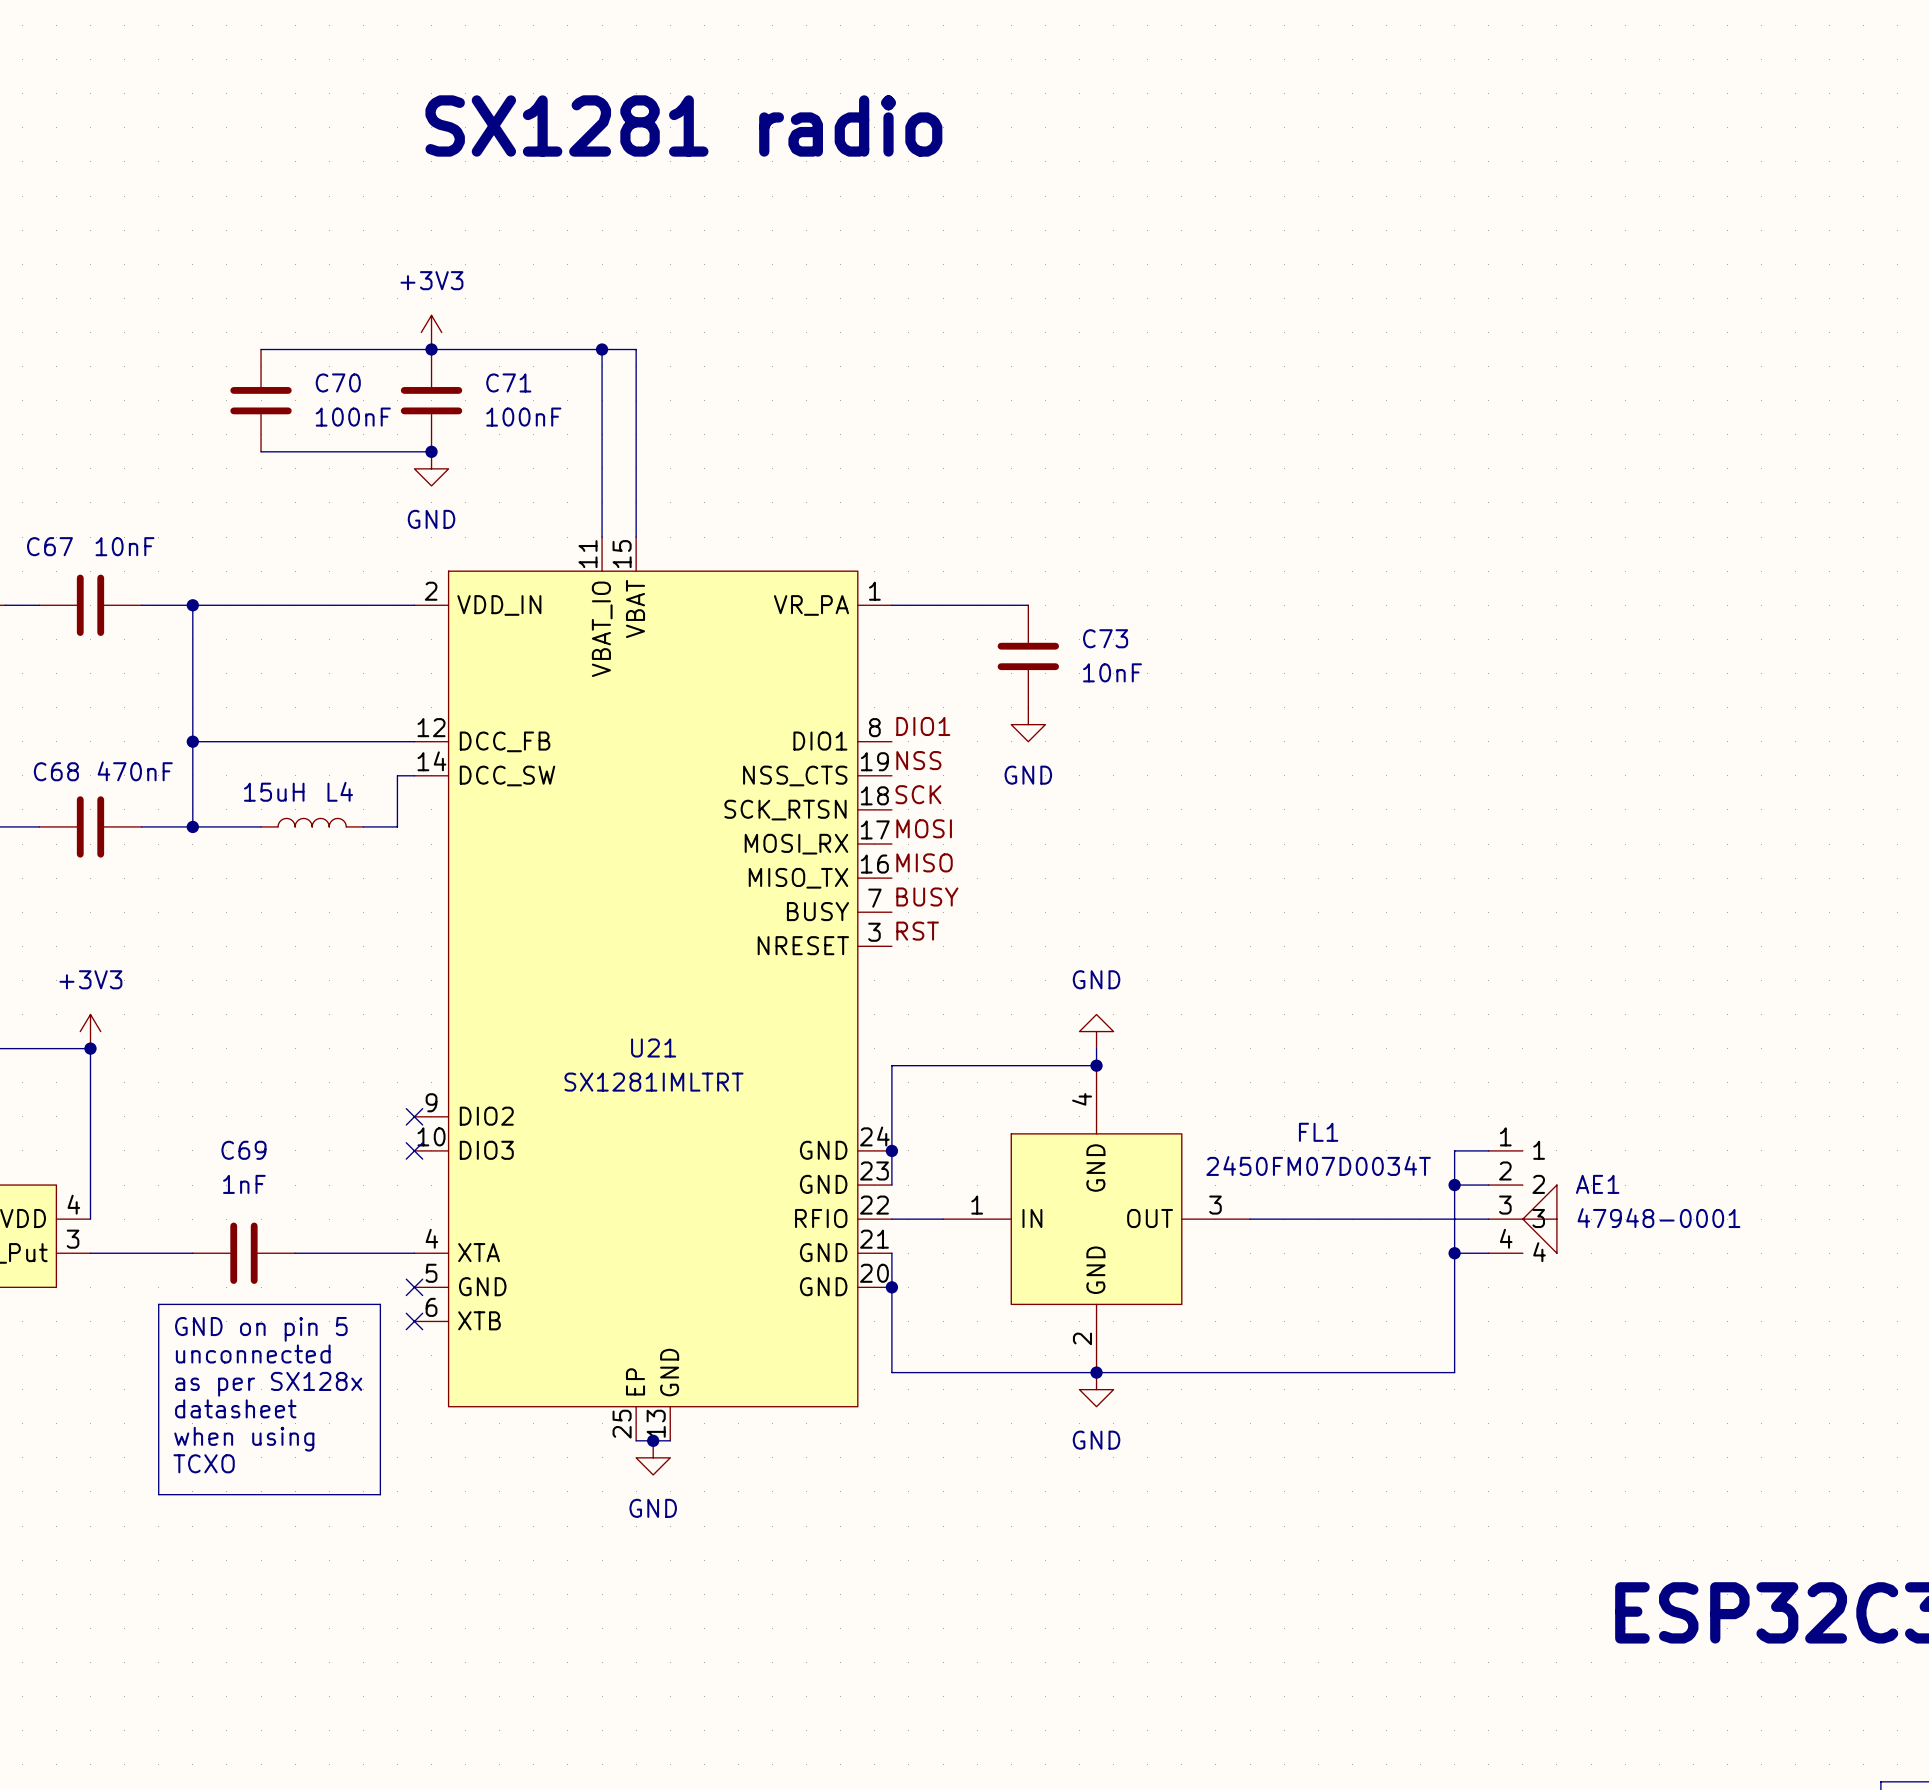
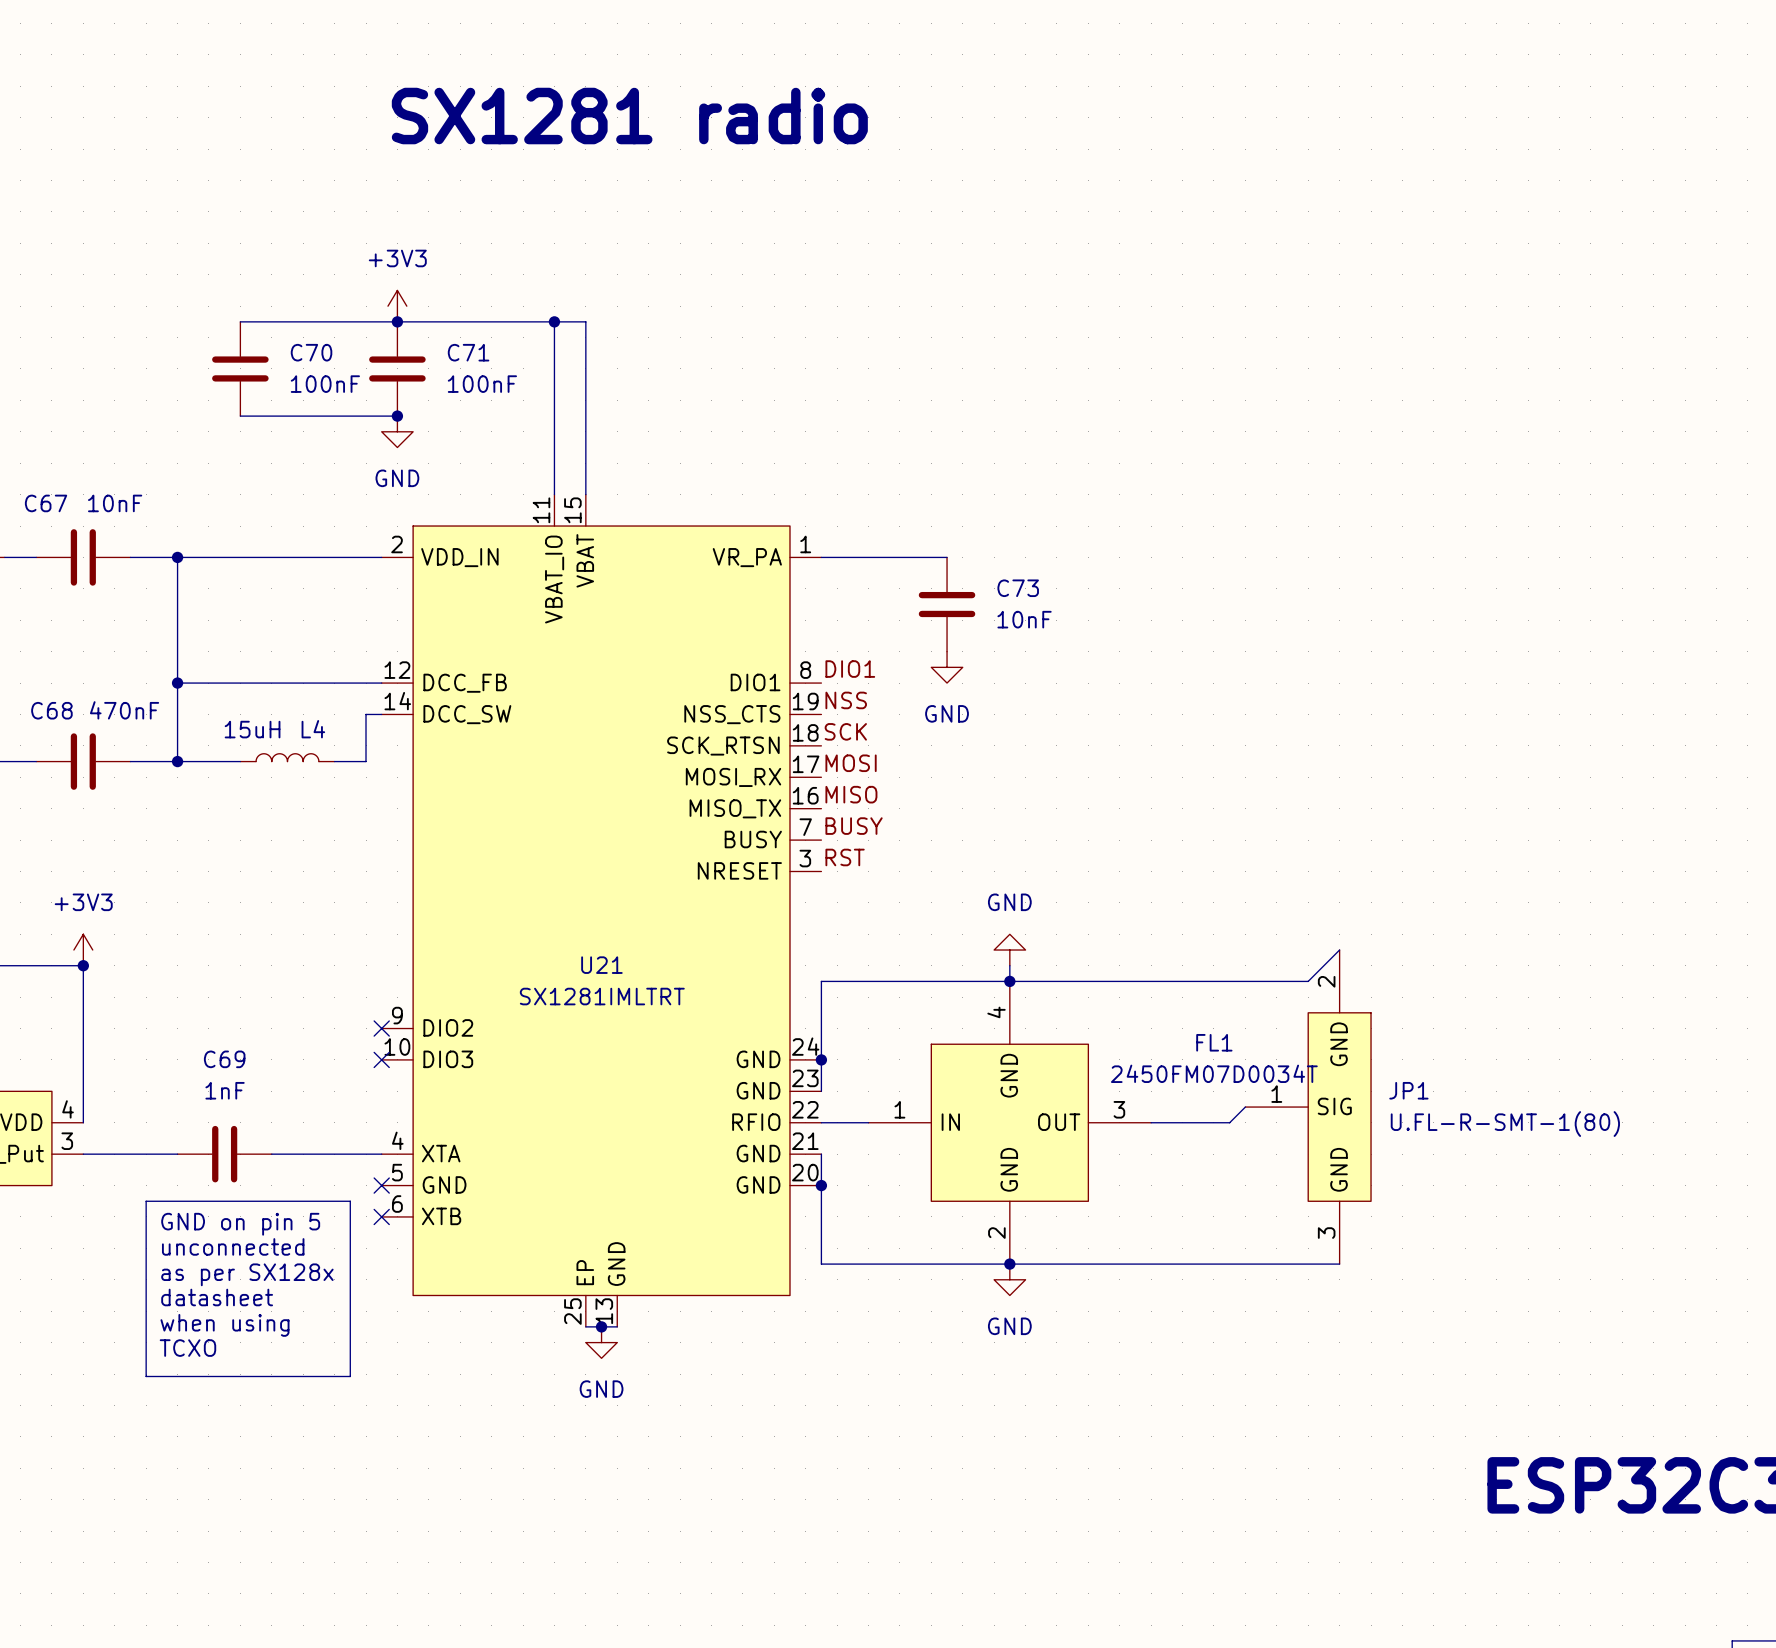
wire: none -> (1339, 950) (1308, 981) (1009, 981)
junction: (1454, 1185) -> none
JP1: none -> U.FL-R-SMT-1(80) (1308, 1107)
AE1: 47948-0001 (1522, 1202) -> none
wire: (1335, 1219) (1488, 1219) -> (1229, 1122) (1245, 1107)
junction: (1454, 1253) -> none

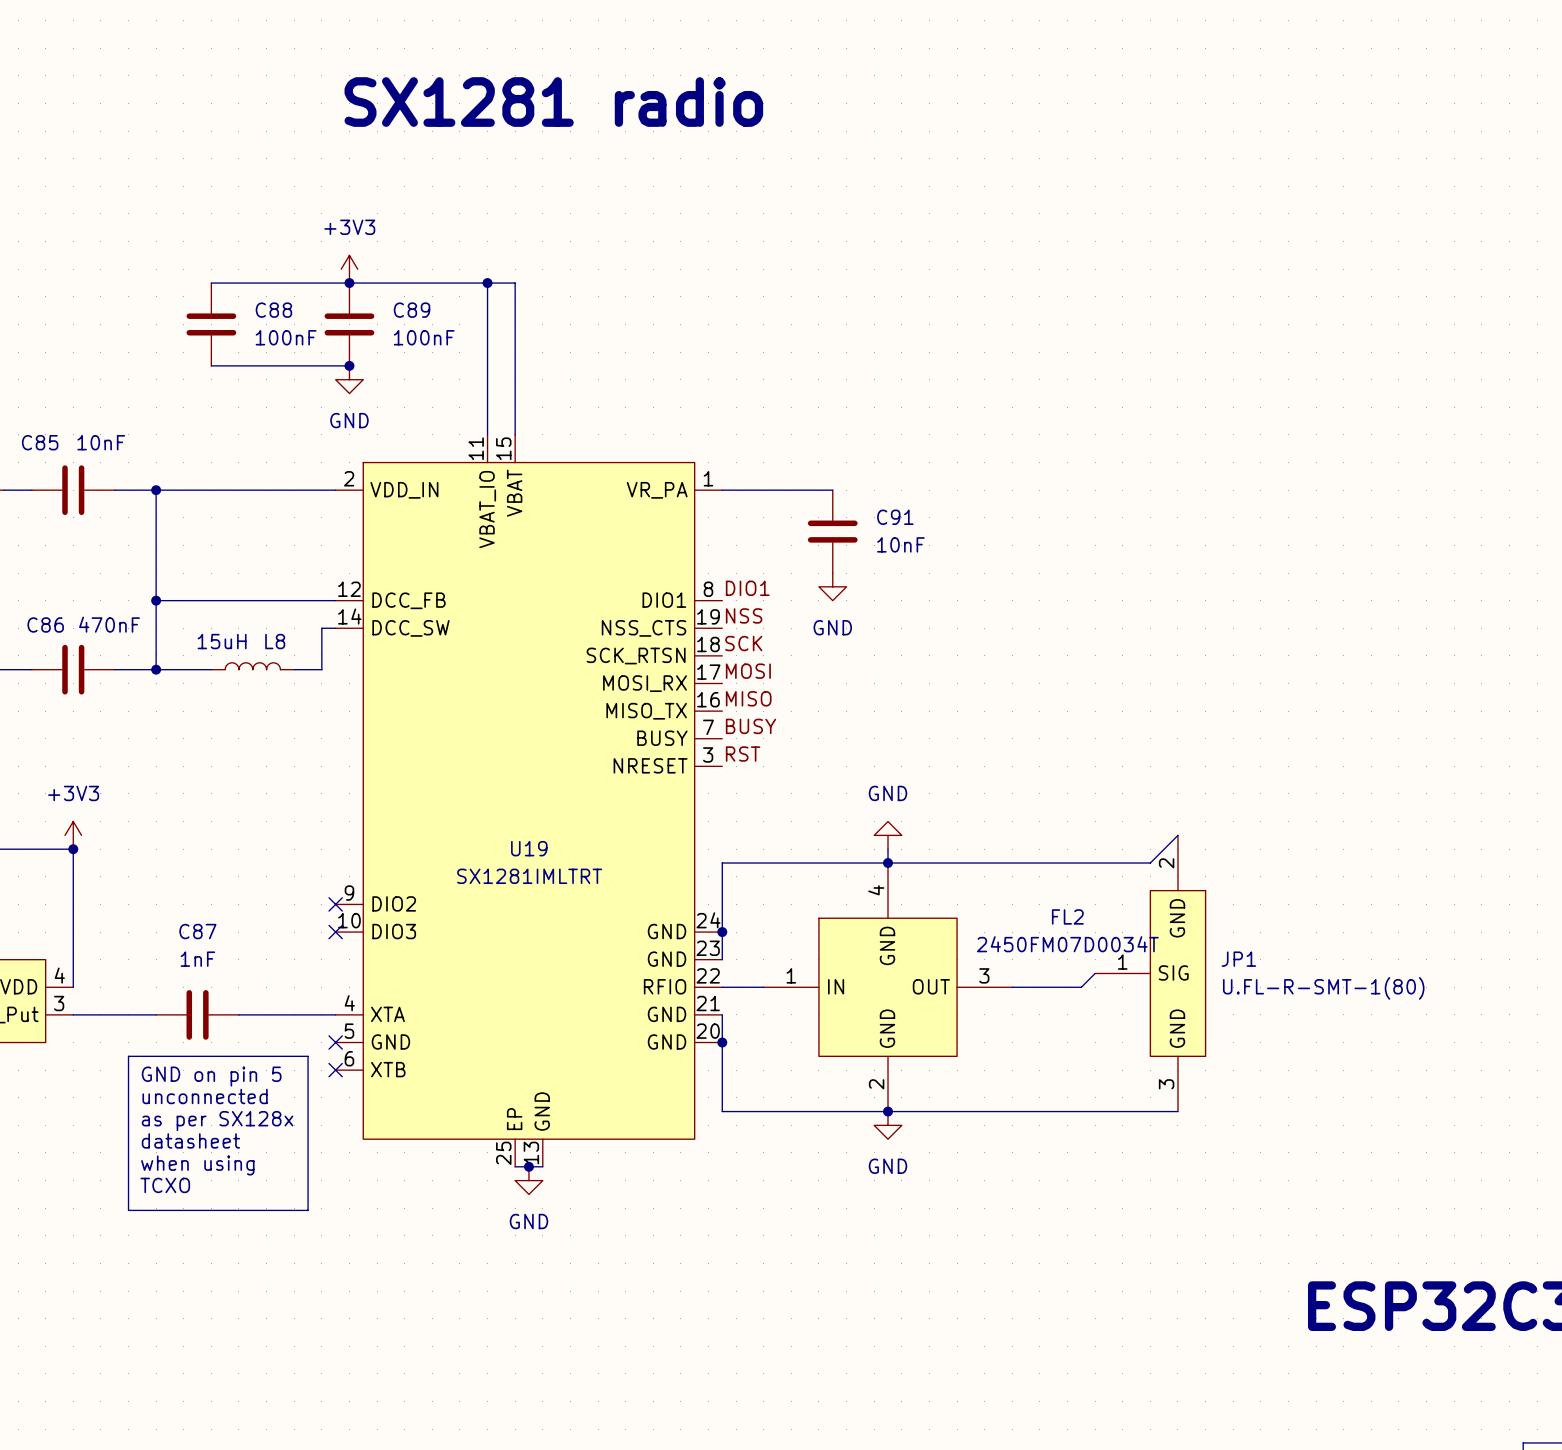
C70 name: C70 (311, 352) -> C88 (273, 310)
C71 name: C71 (468, 352) -> C89 (412, 310)
C67 name: C67 (46, 503) -> C85 (40, 442)
C73 name: C73 (1018, 588) -> C91 (895, 517)
C68 name: C68 (51, 710) -> C86 (45, 624)
L4 name: L4 (313, 729) -> L8 (275, 641)
U21 name: U21 (601, 965) -> U19 (529, 848)
FL1 name: FL1 (1214, 1042) -> FL2 (1067, 916)
C69 name: C69 (224, 1059) -> C87 (197, 931)

